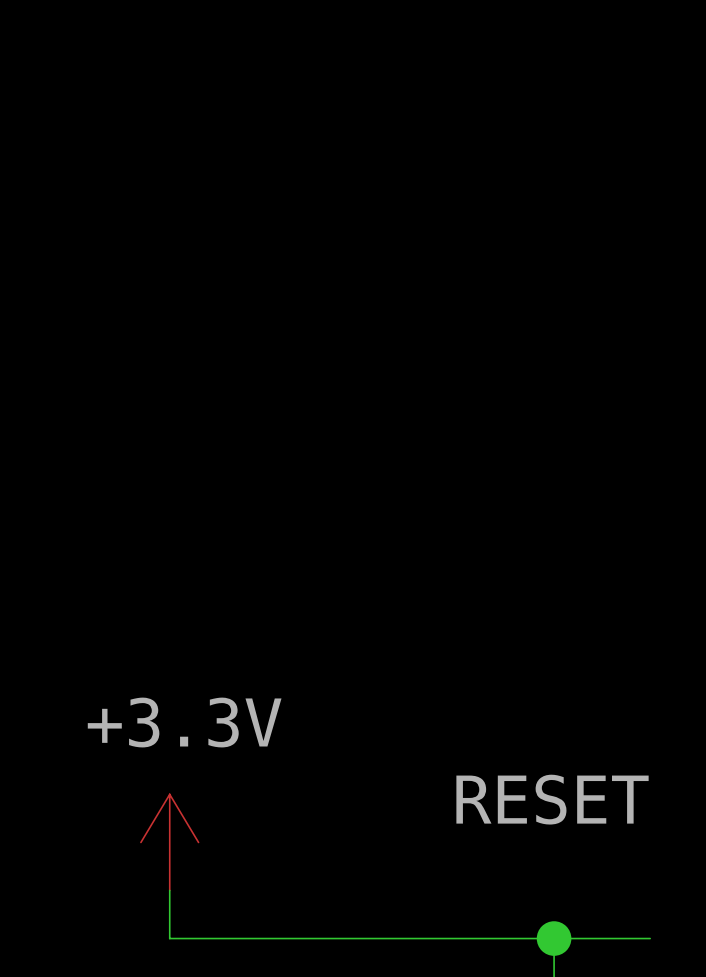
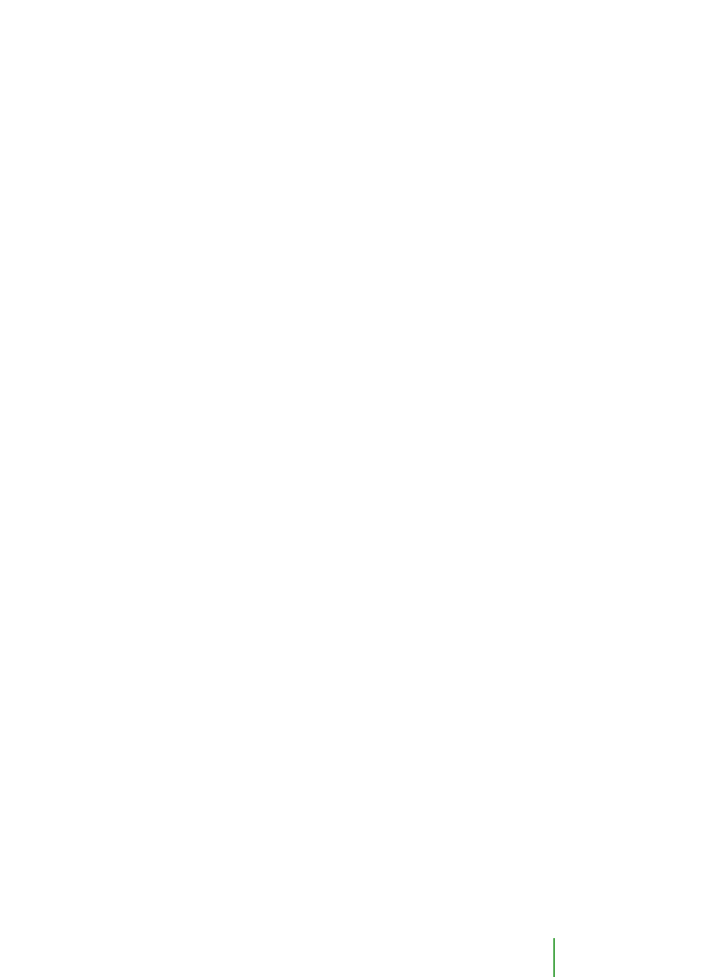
label: RESET (552, 799) -> none
power symbol: +3.3V (169, 842) -> none
wire: (169, 890) (169, 938) (650, 938) -> none
junction: (554, 938) -> none

